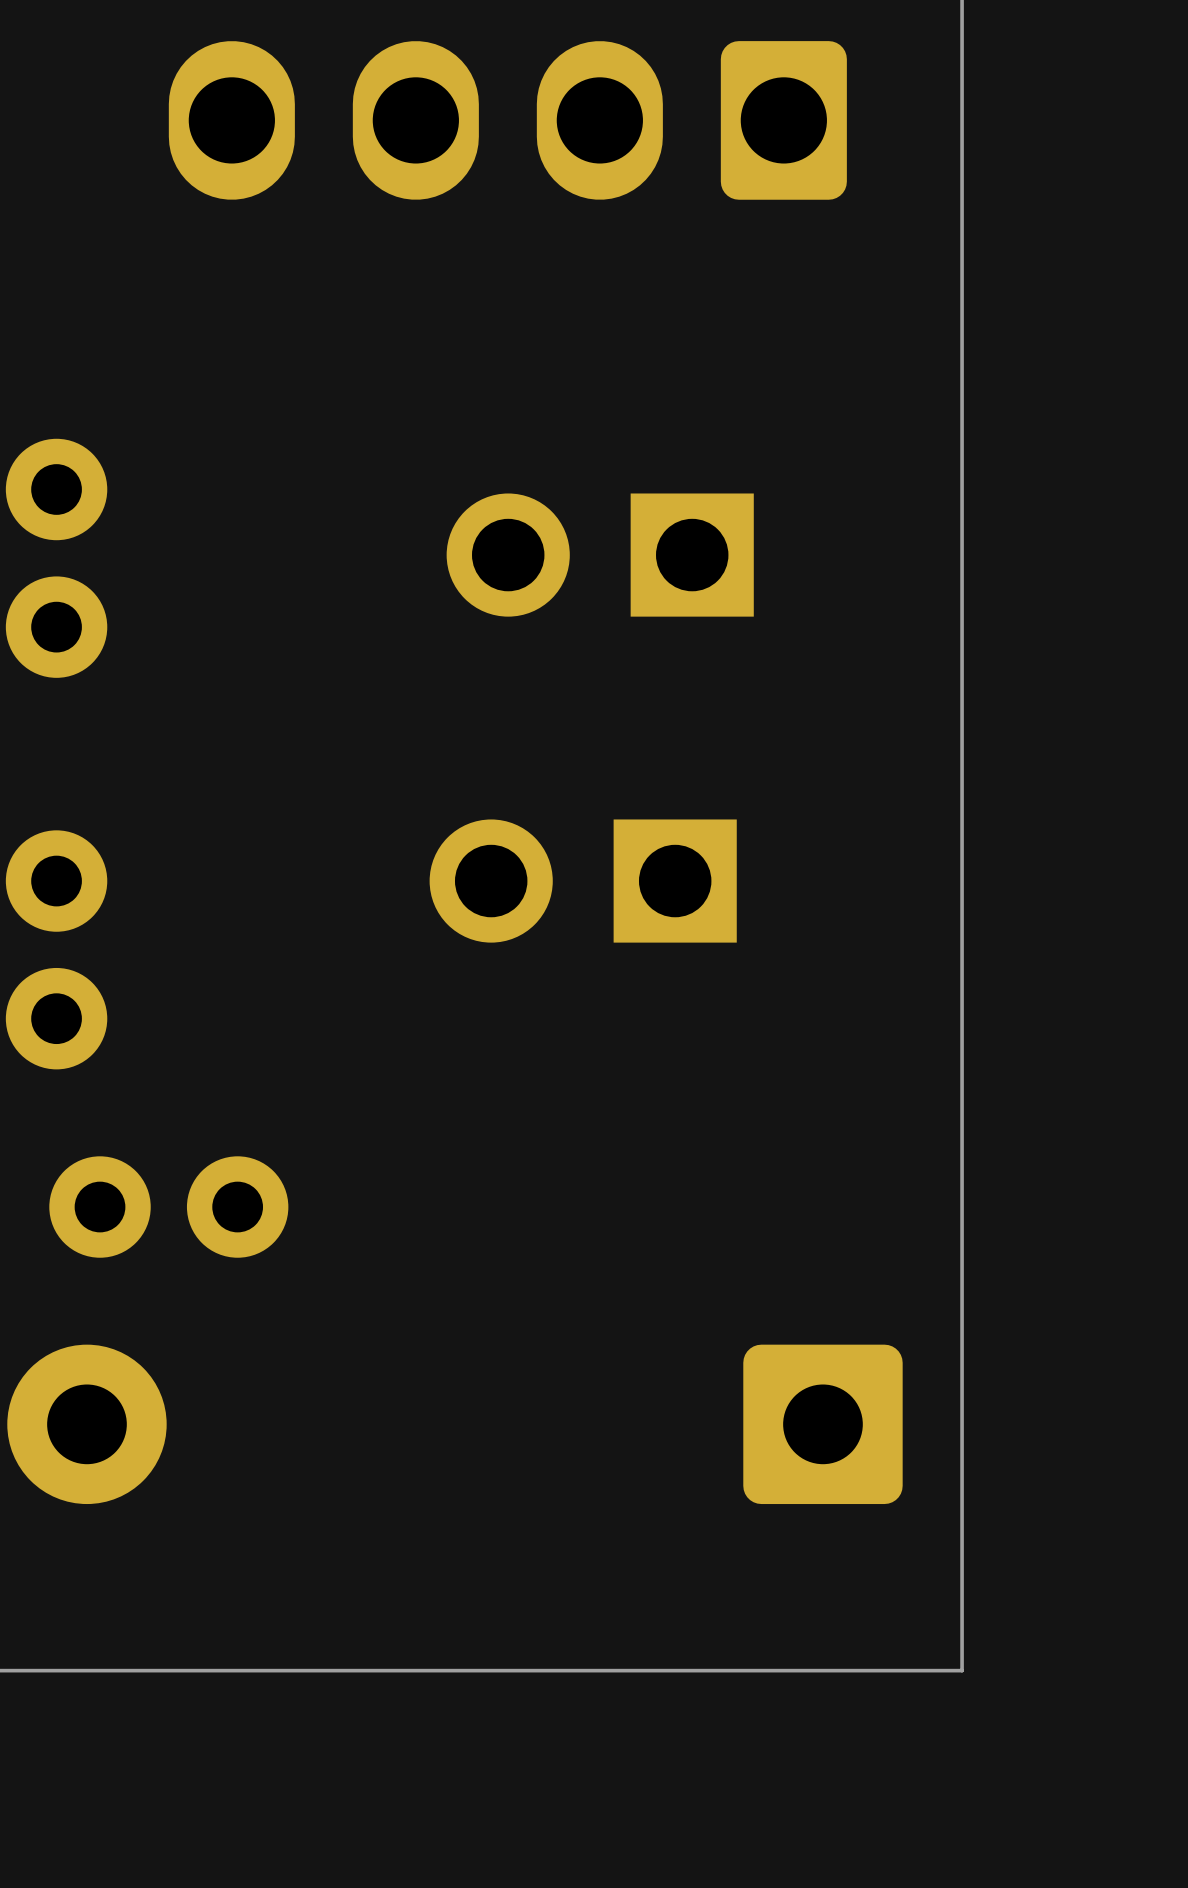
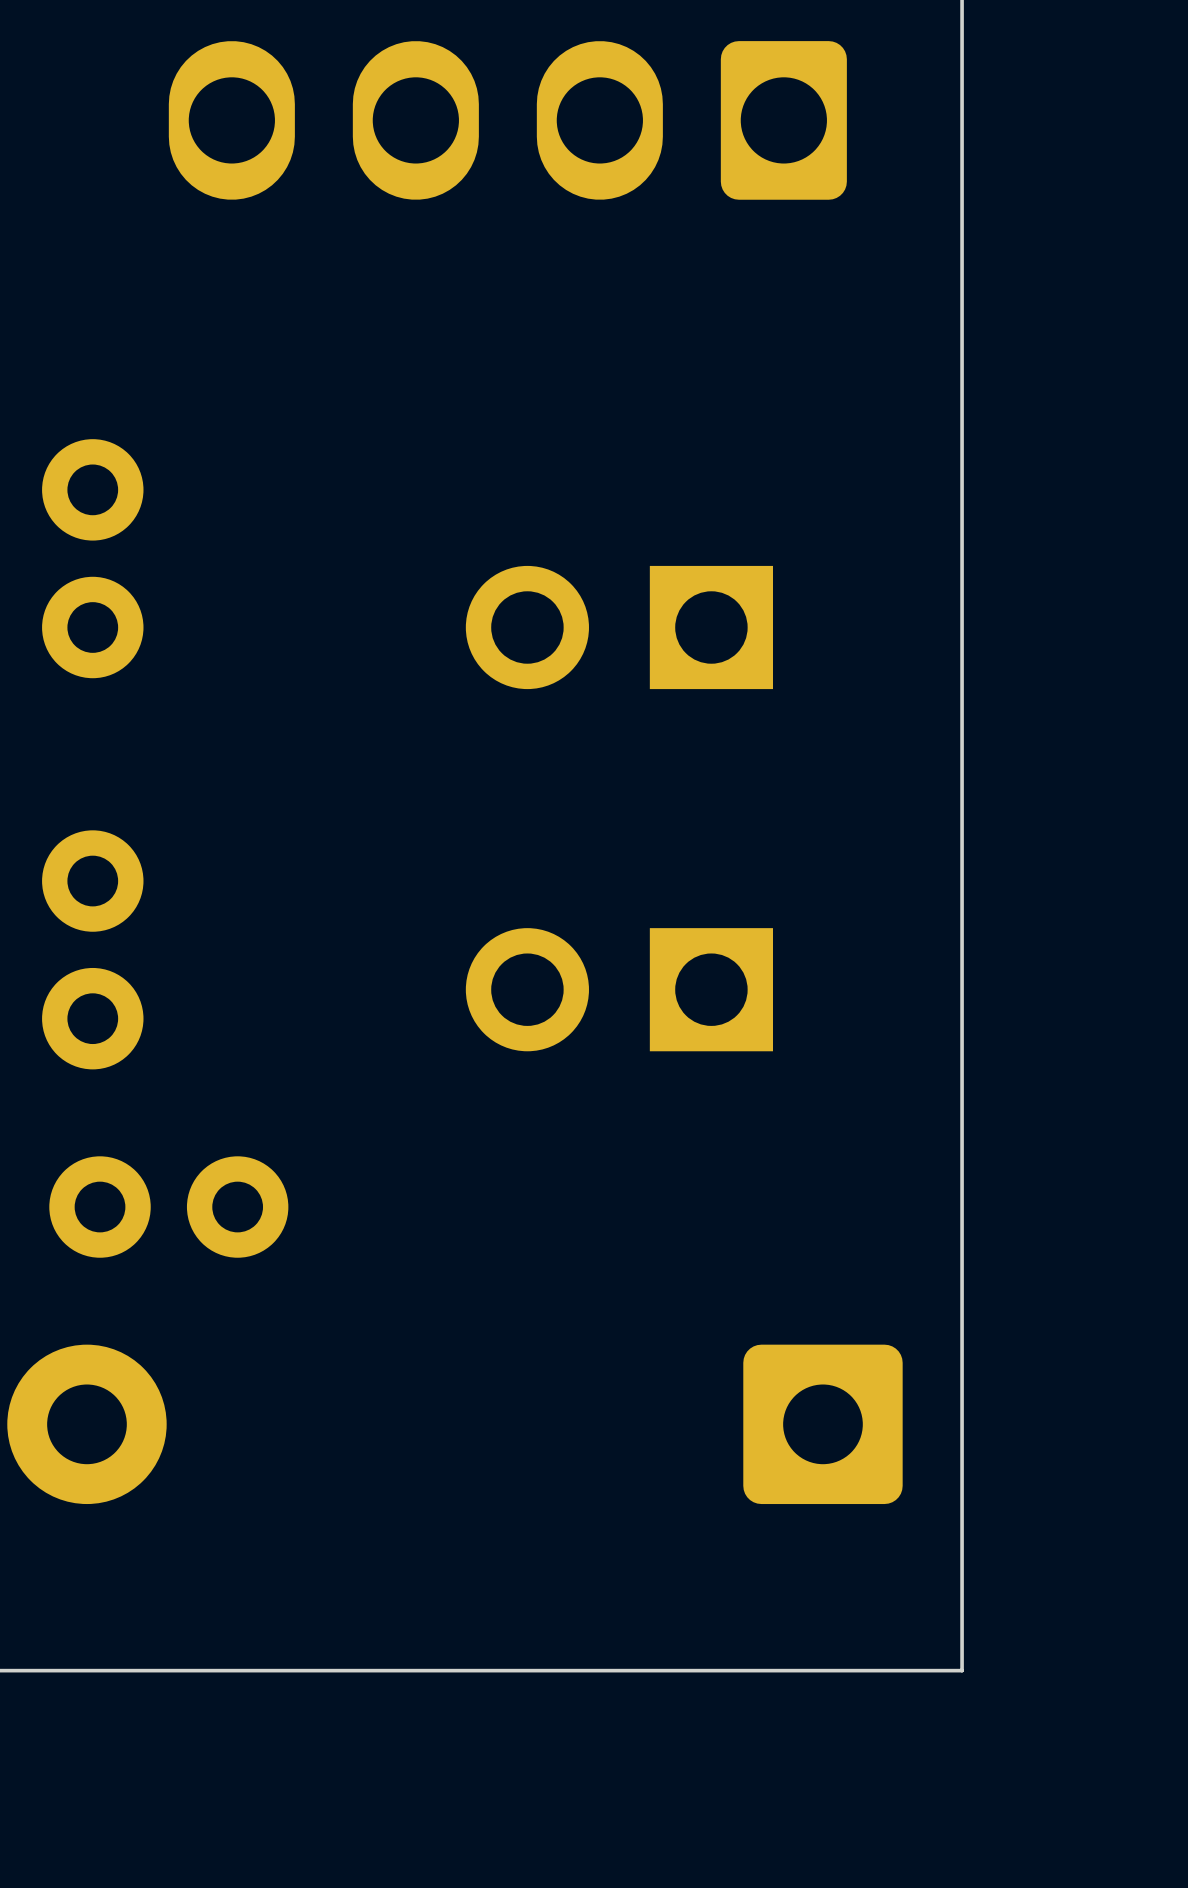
part position: (600, 555) -> (619, 627)
part position: (56, 558) -> (92, 558)
part position: (583, 881) -> (619, 989)
part position: (56, 949) -> (92, 949)

